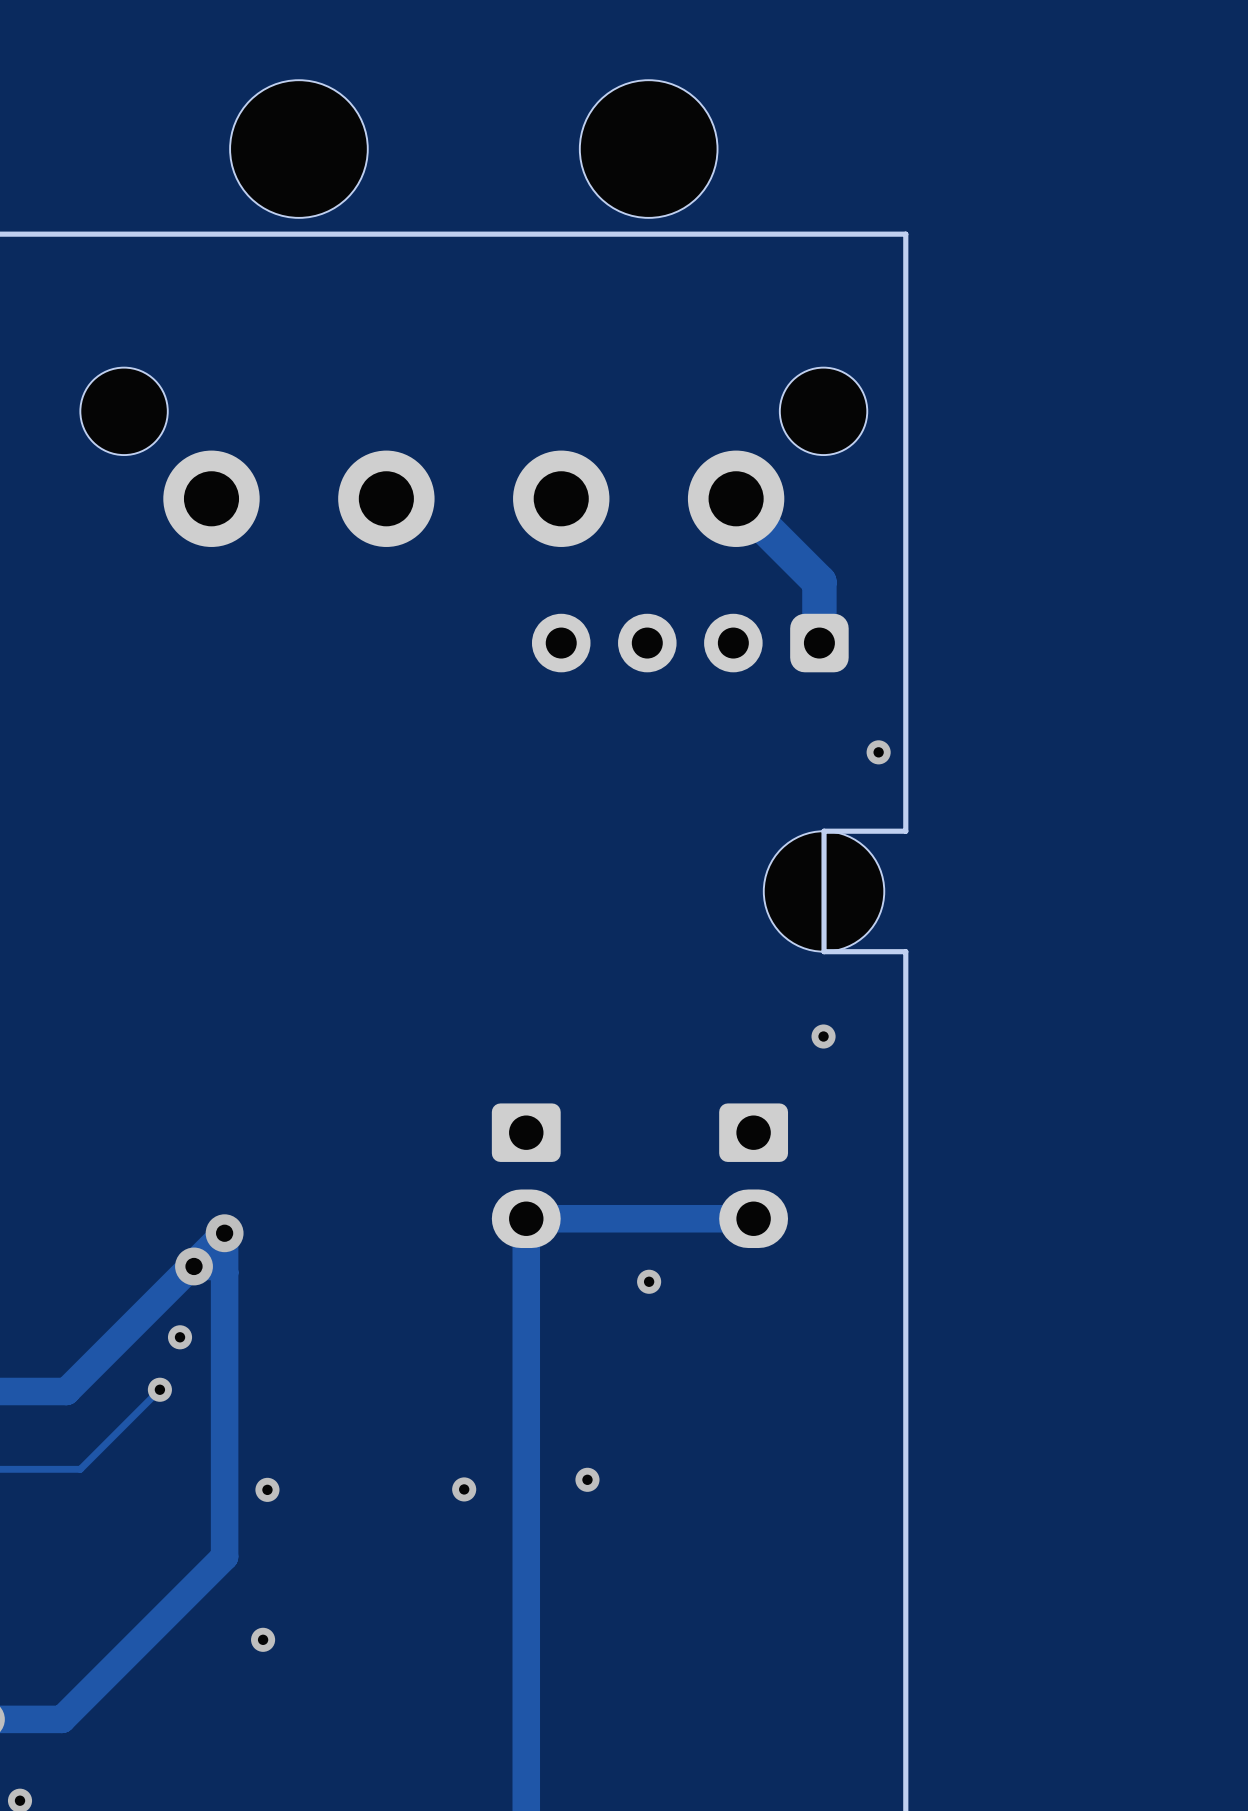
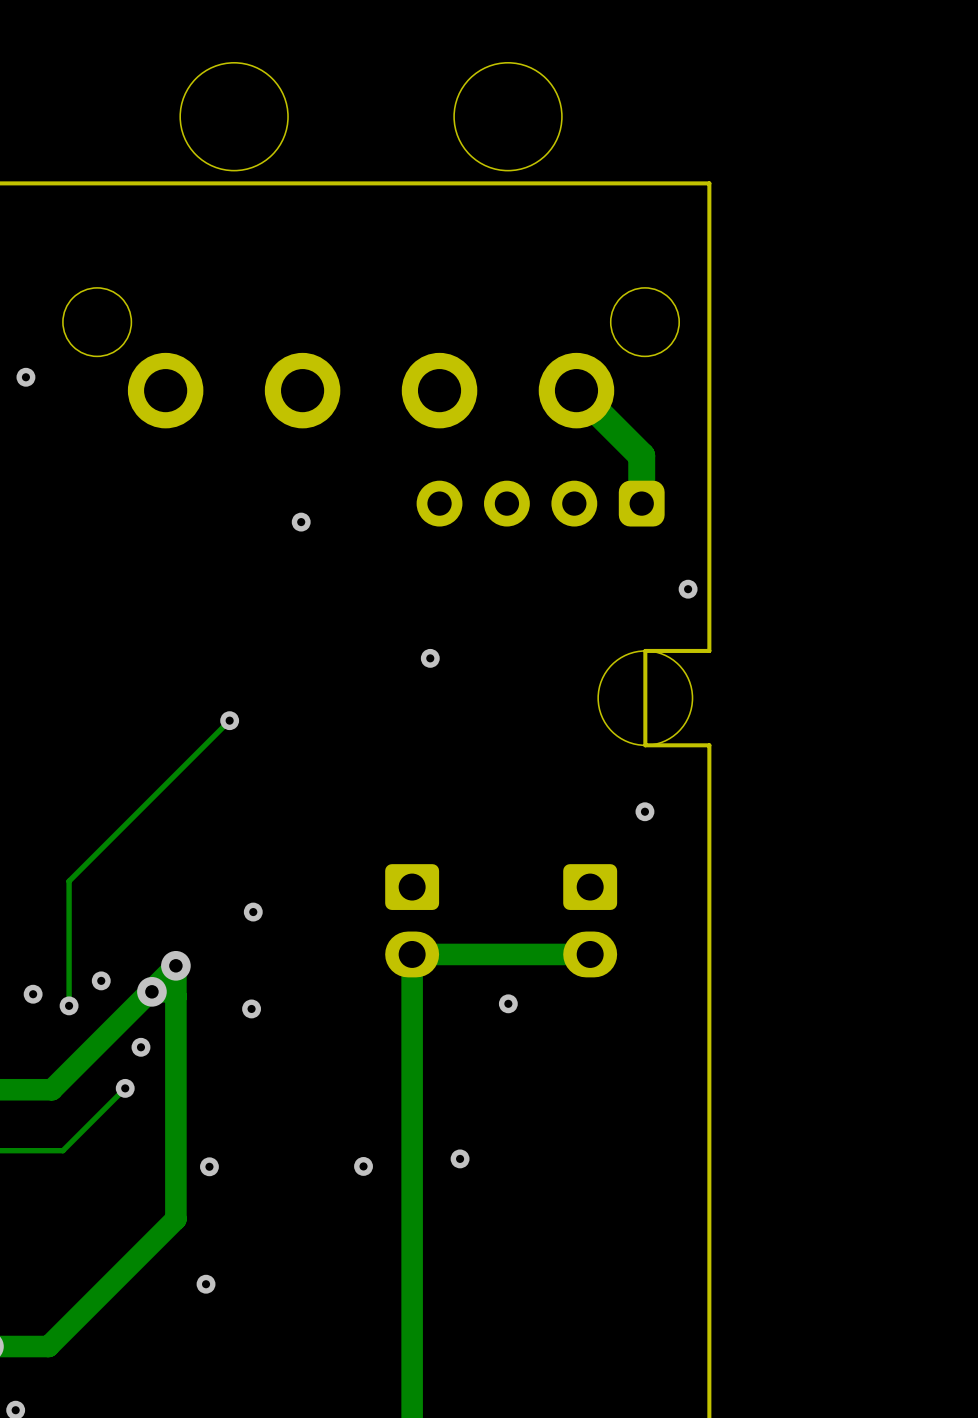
via: none -> (25, 377)
via: none -> (301, 522)
via: none -> (430, 658)
track: none -> (229, 720) (69, 881) (69, 1005)
via: none -> (229, 720)
via: none -> (253, 912)
via: none -> (101, 980)
via: none -> (33, 994)
via: none -> (69, 1005)
via: none -> (251, 1008)

